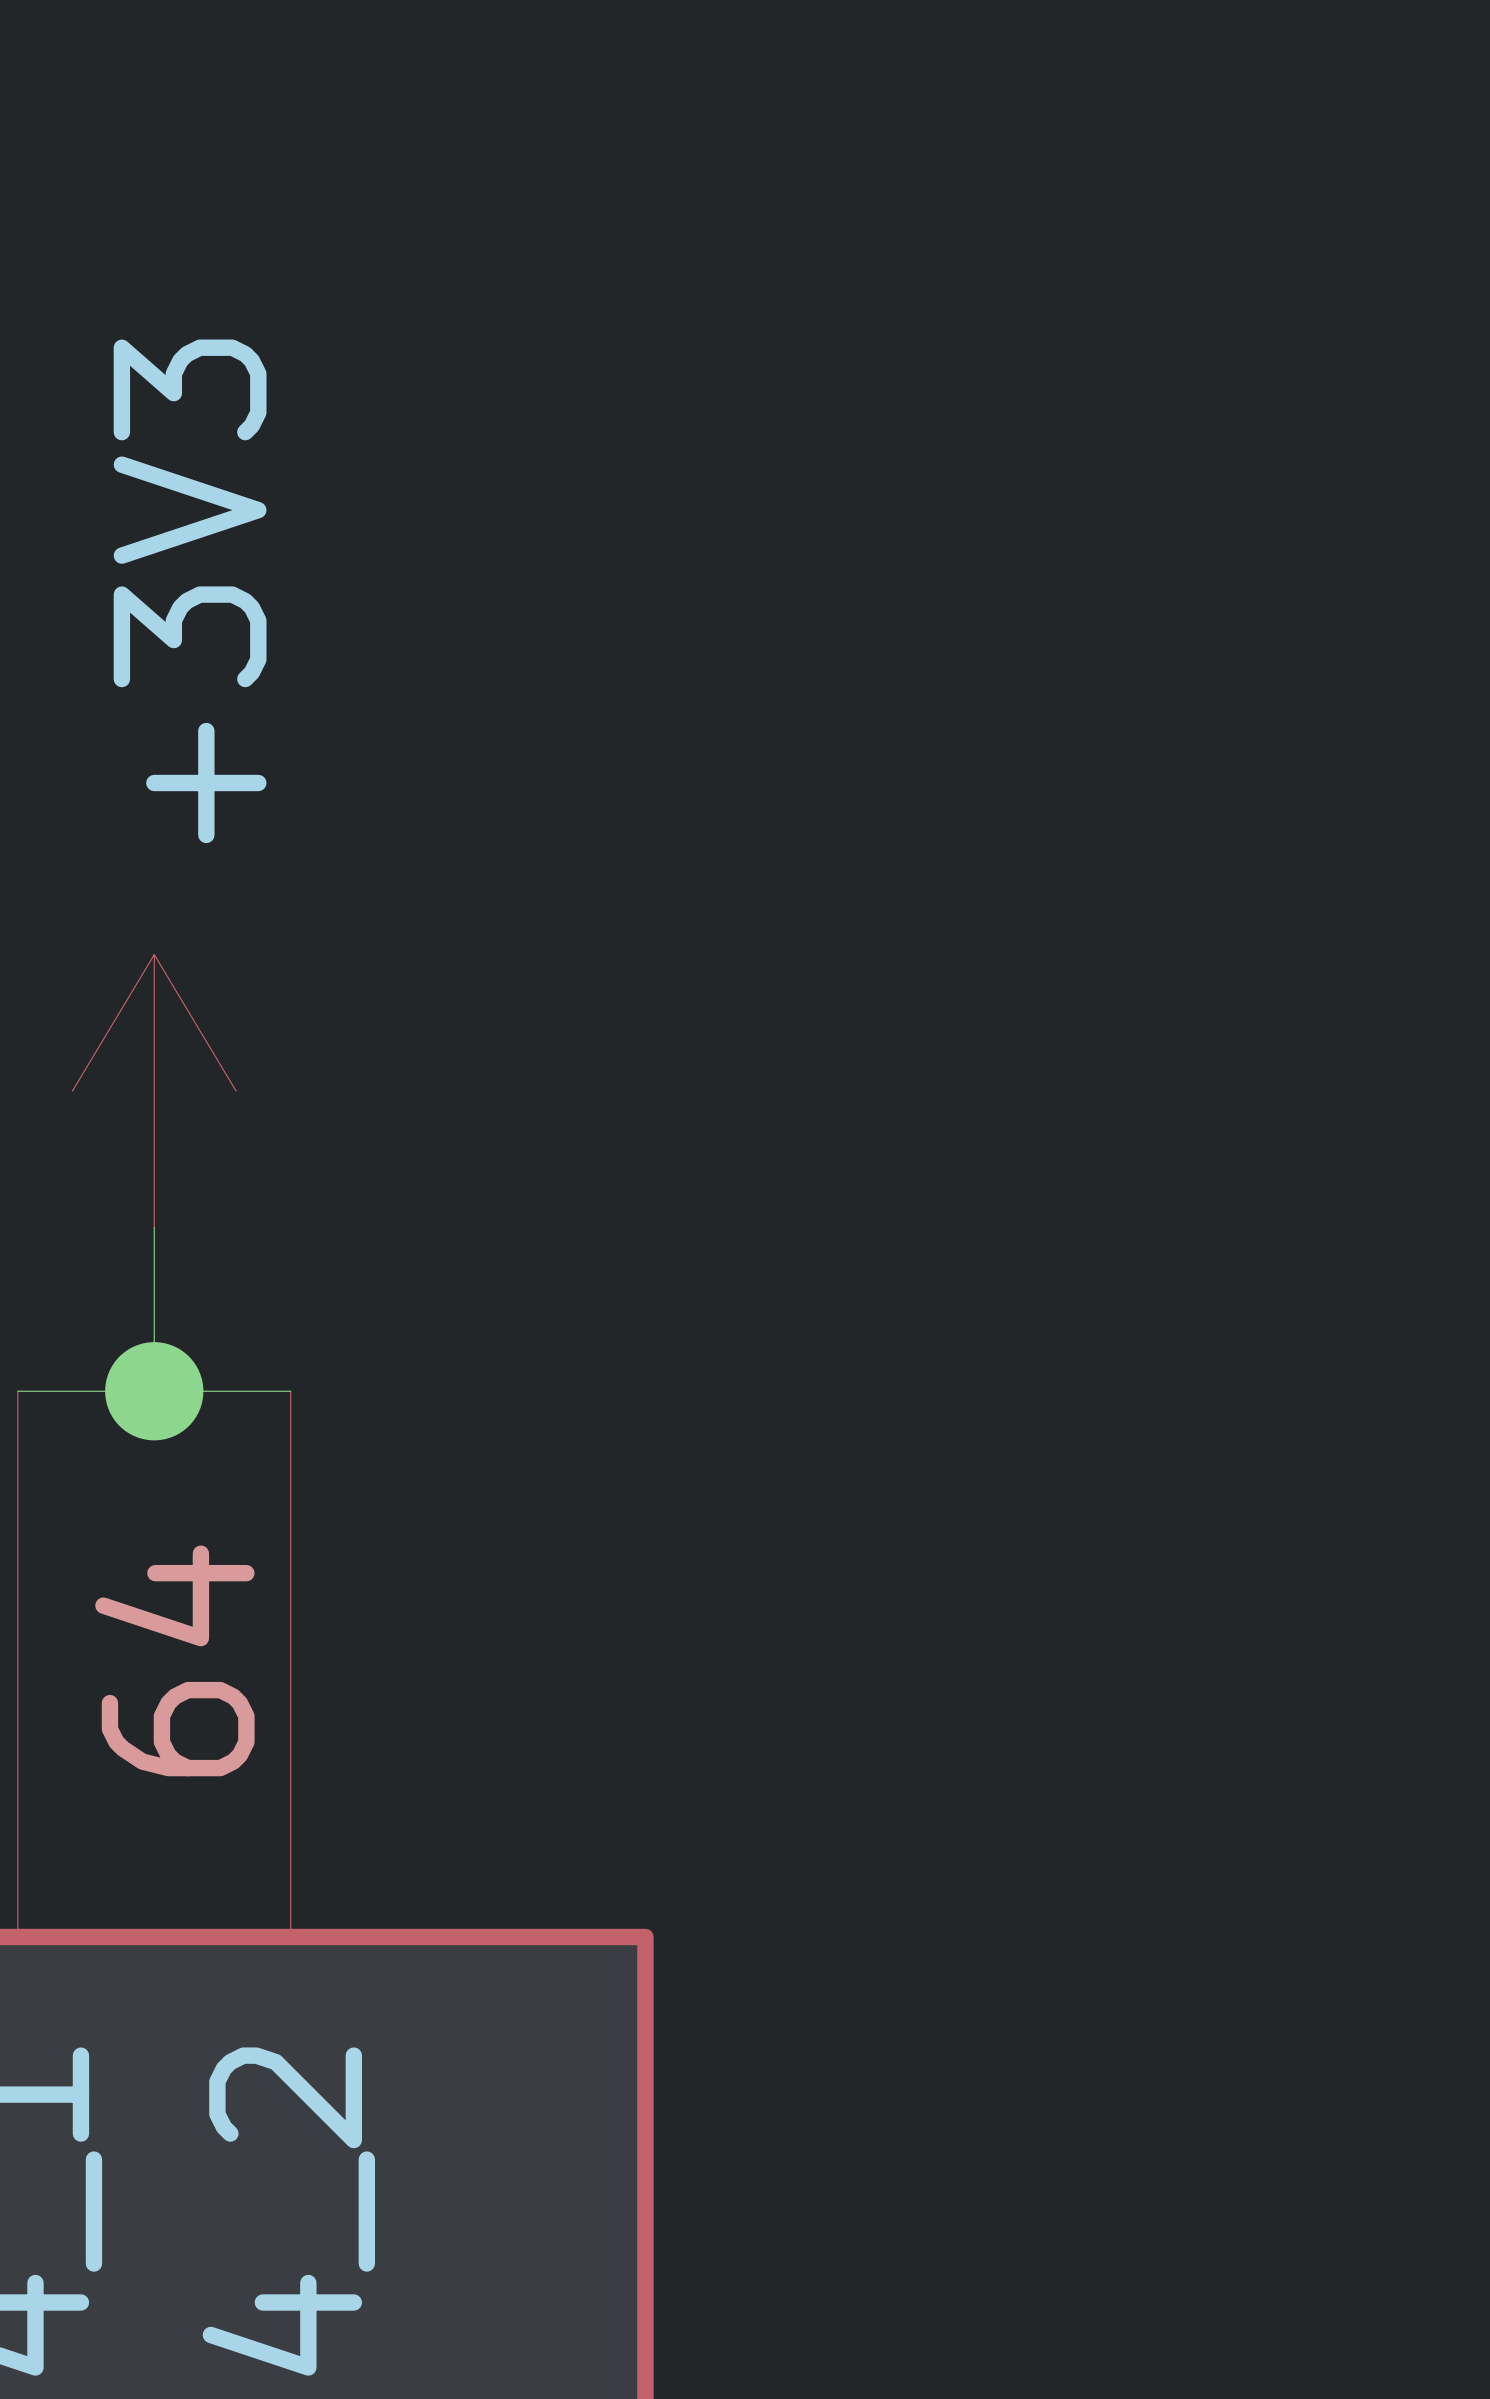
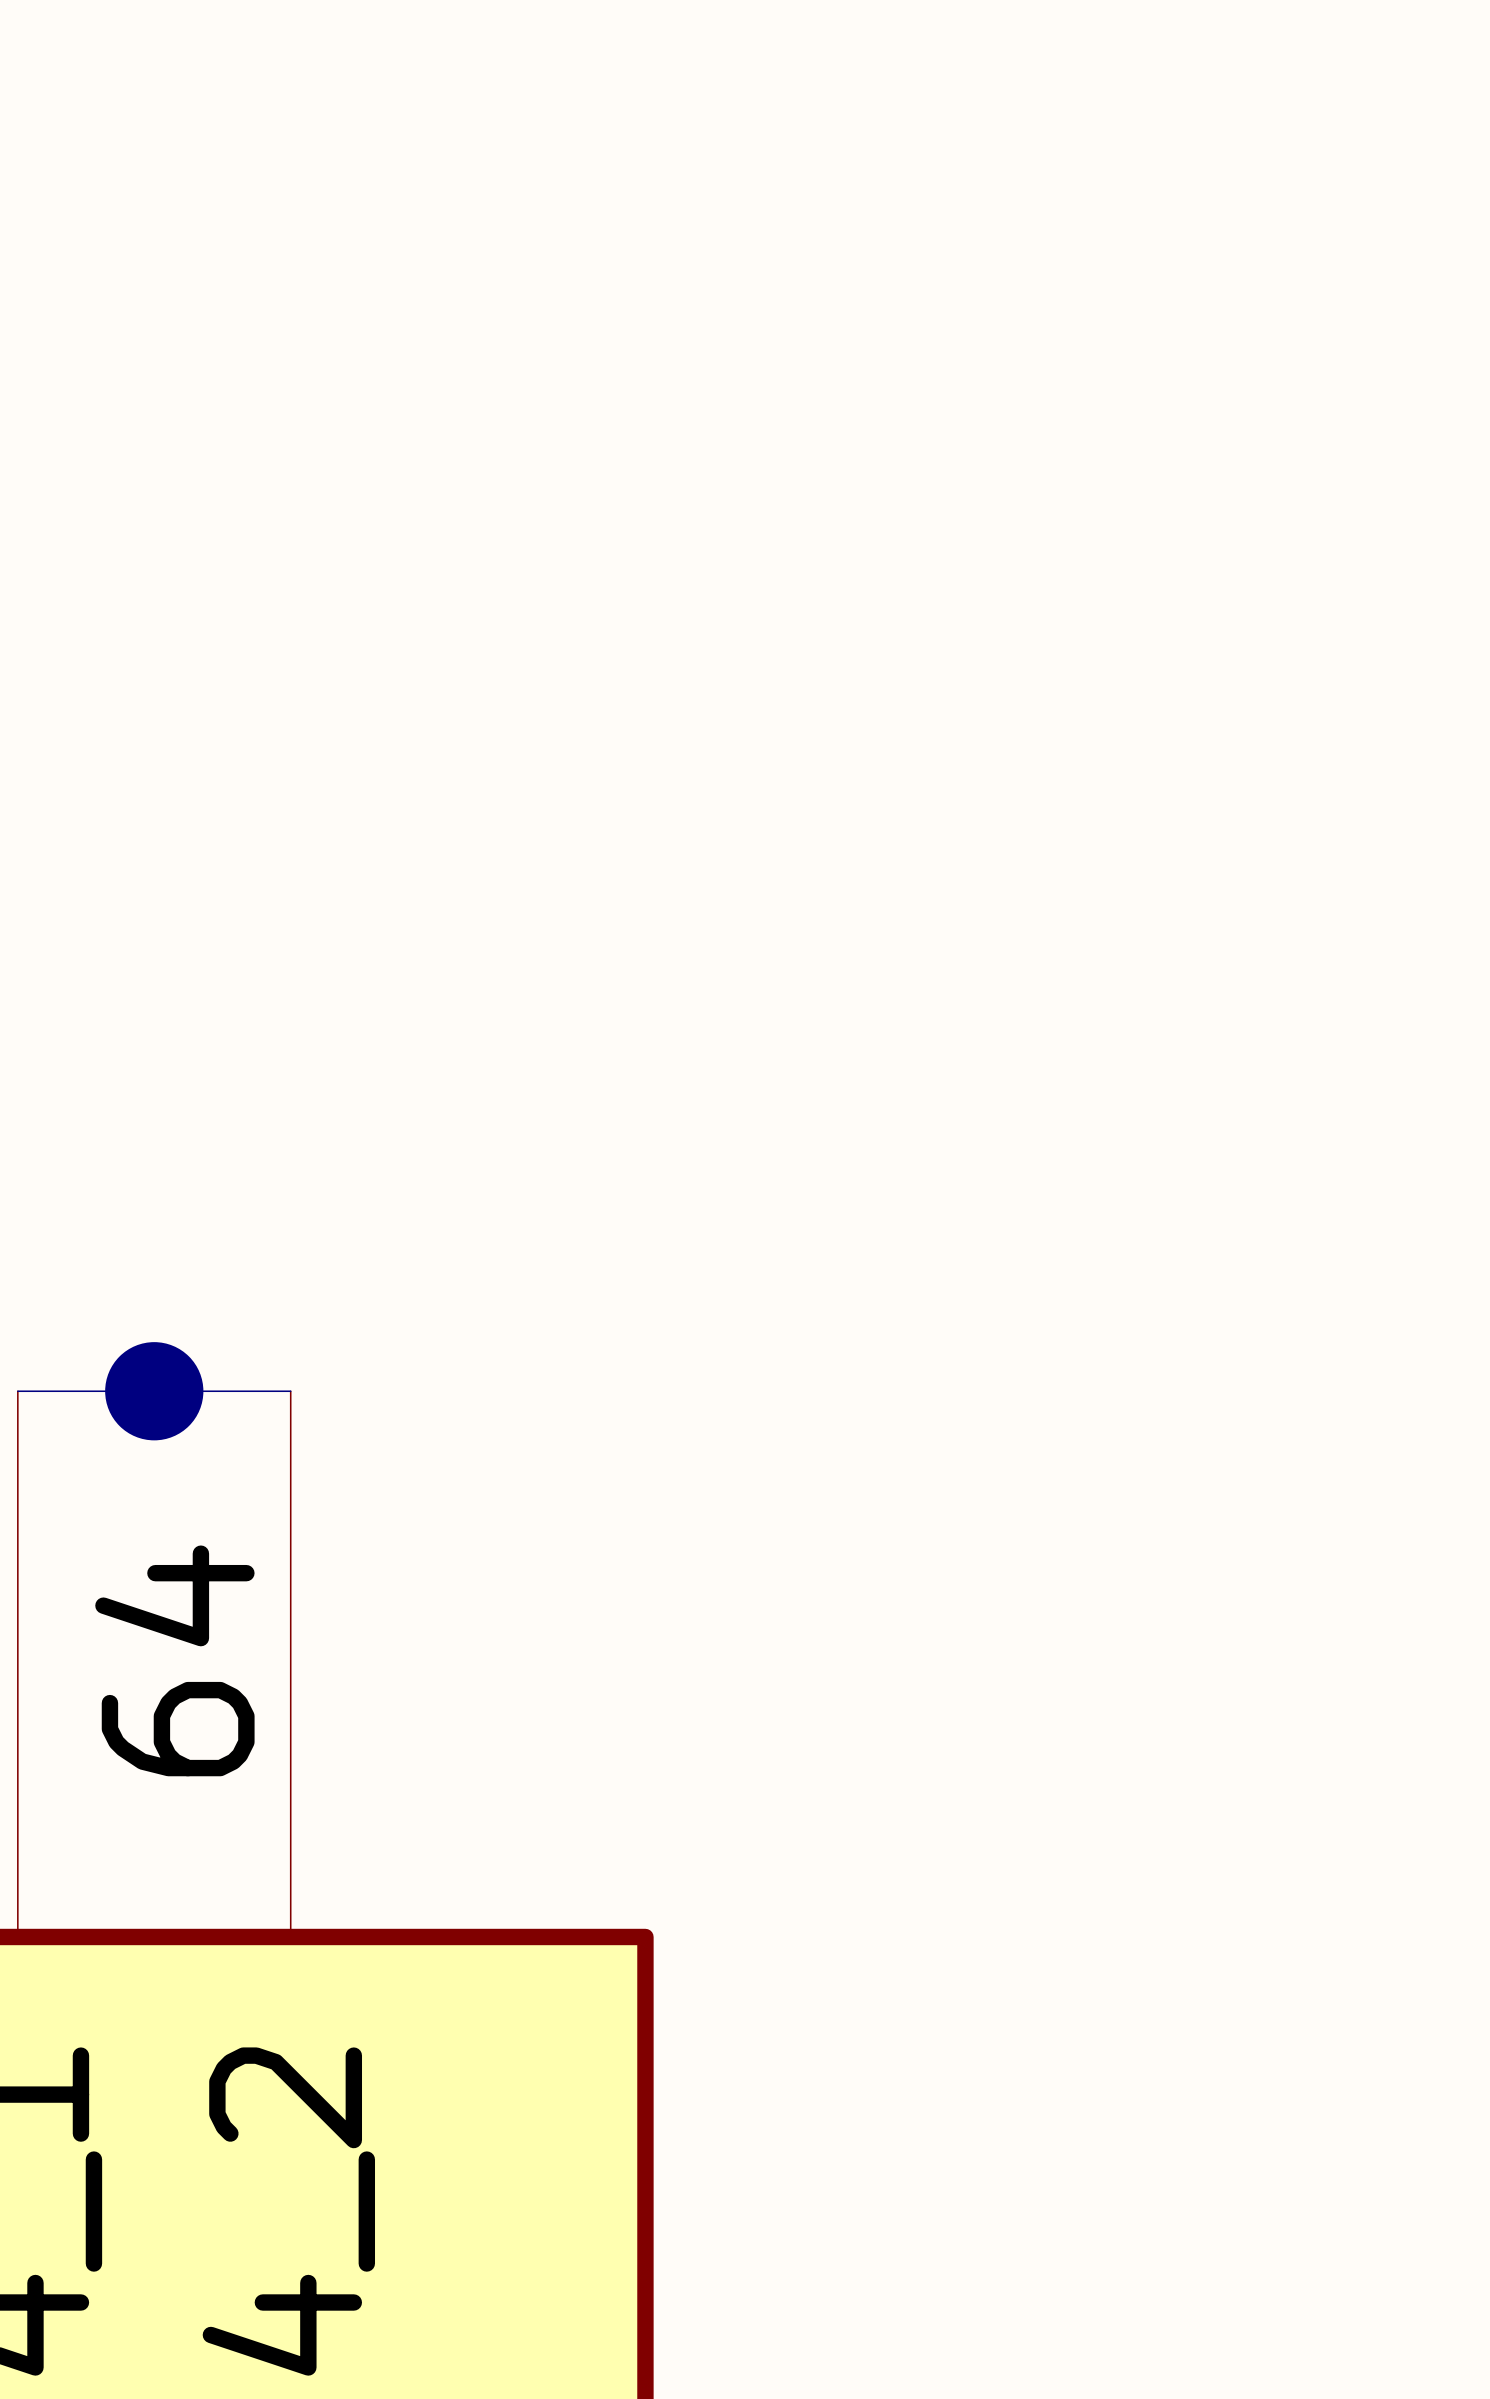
power symbol: +3V3 (154, 1091) -> none
wire: (154, 1227) (154, 1391) -> none

